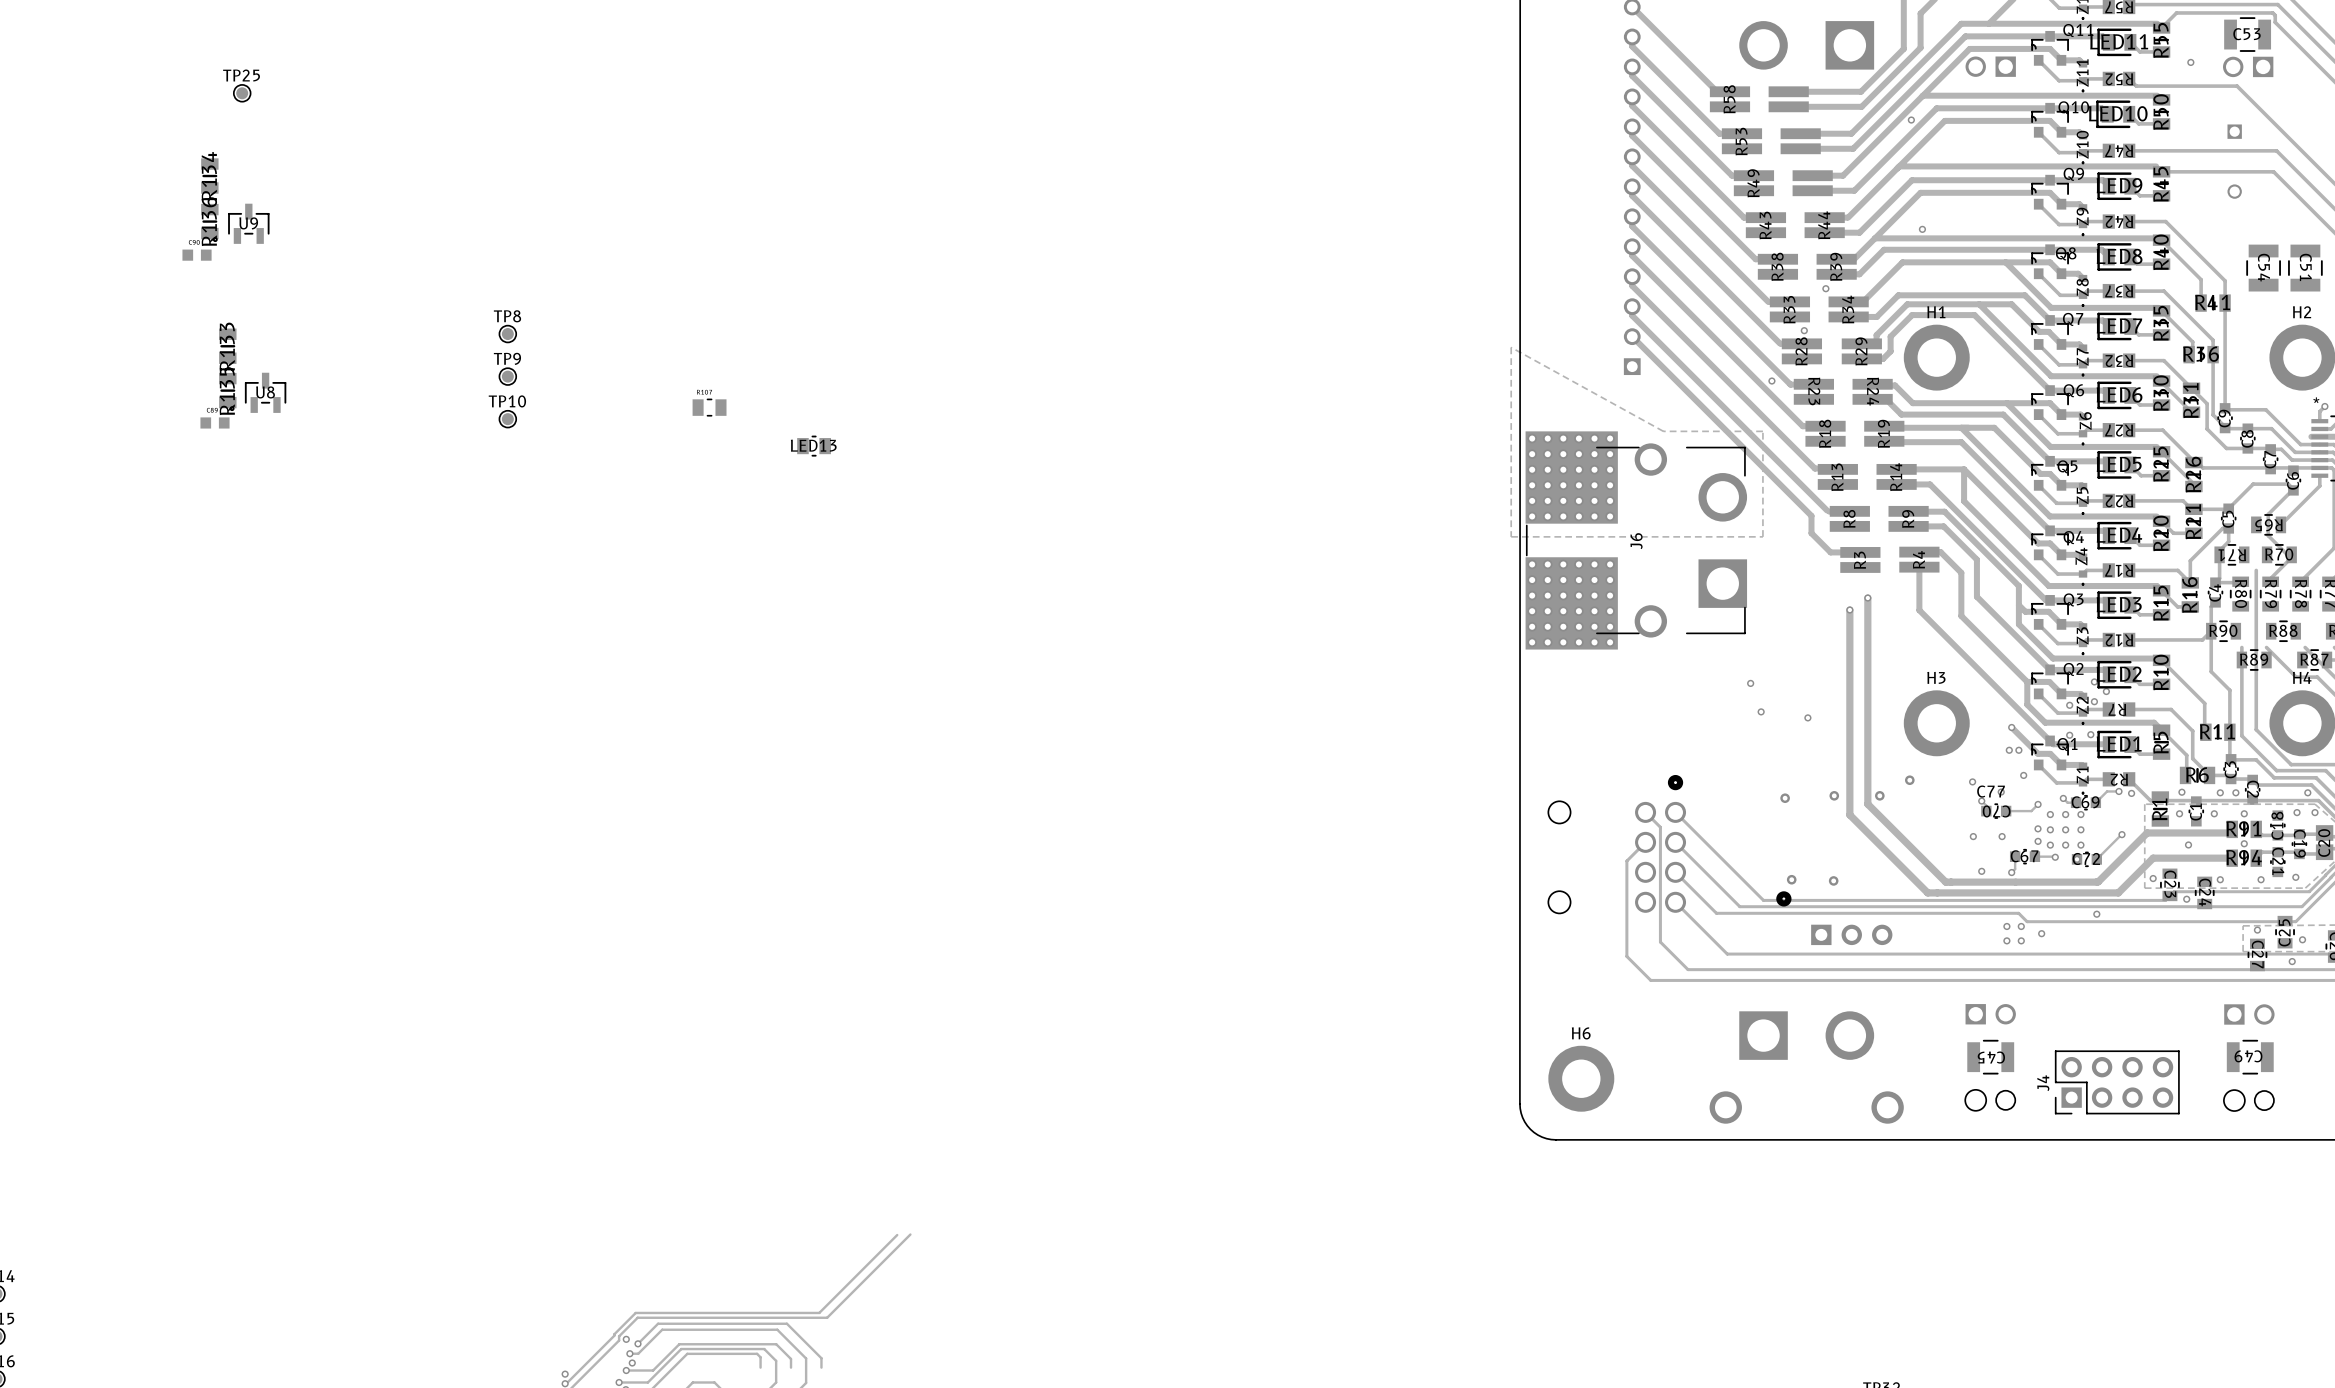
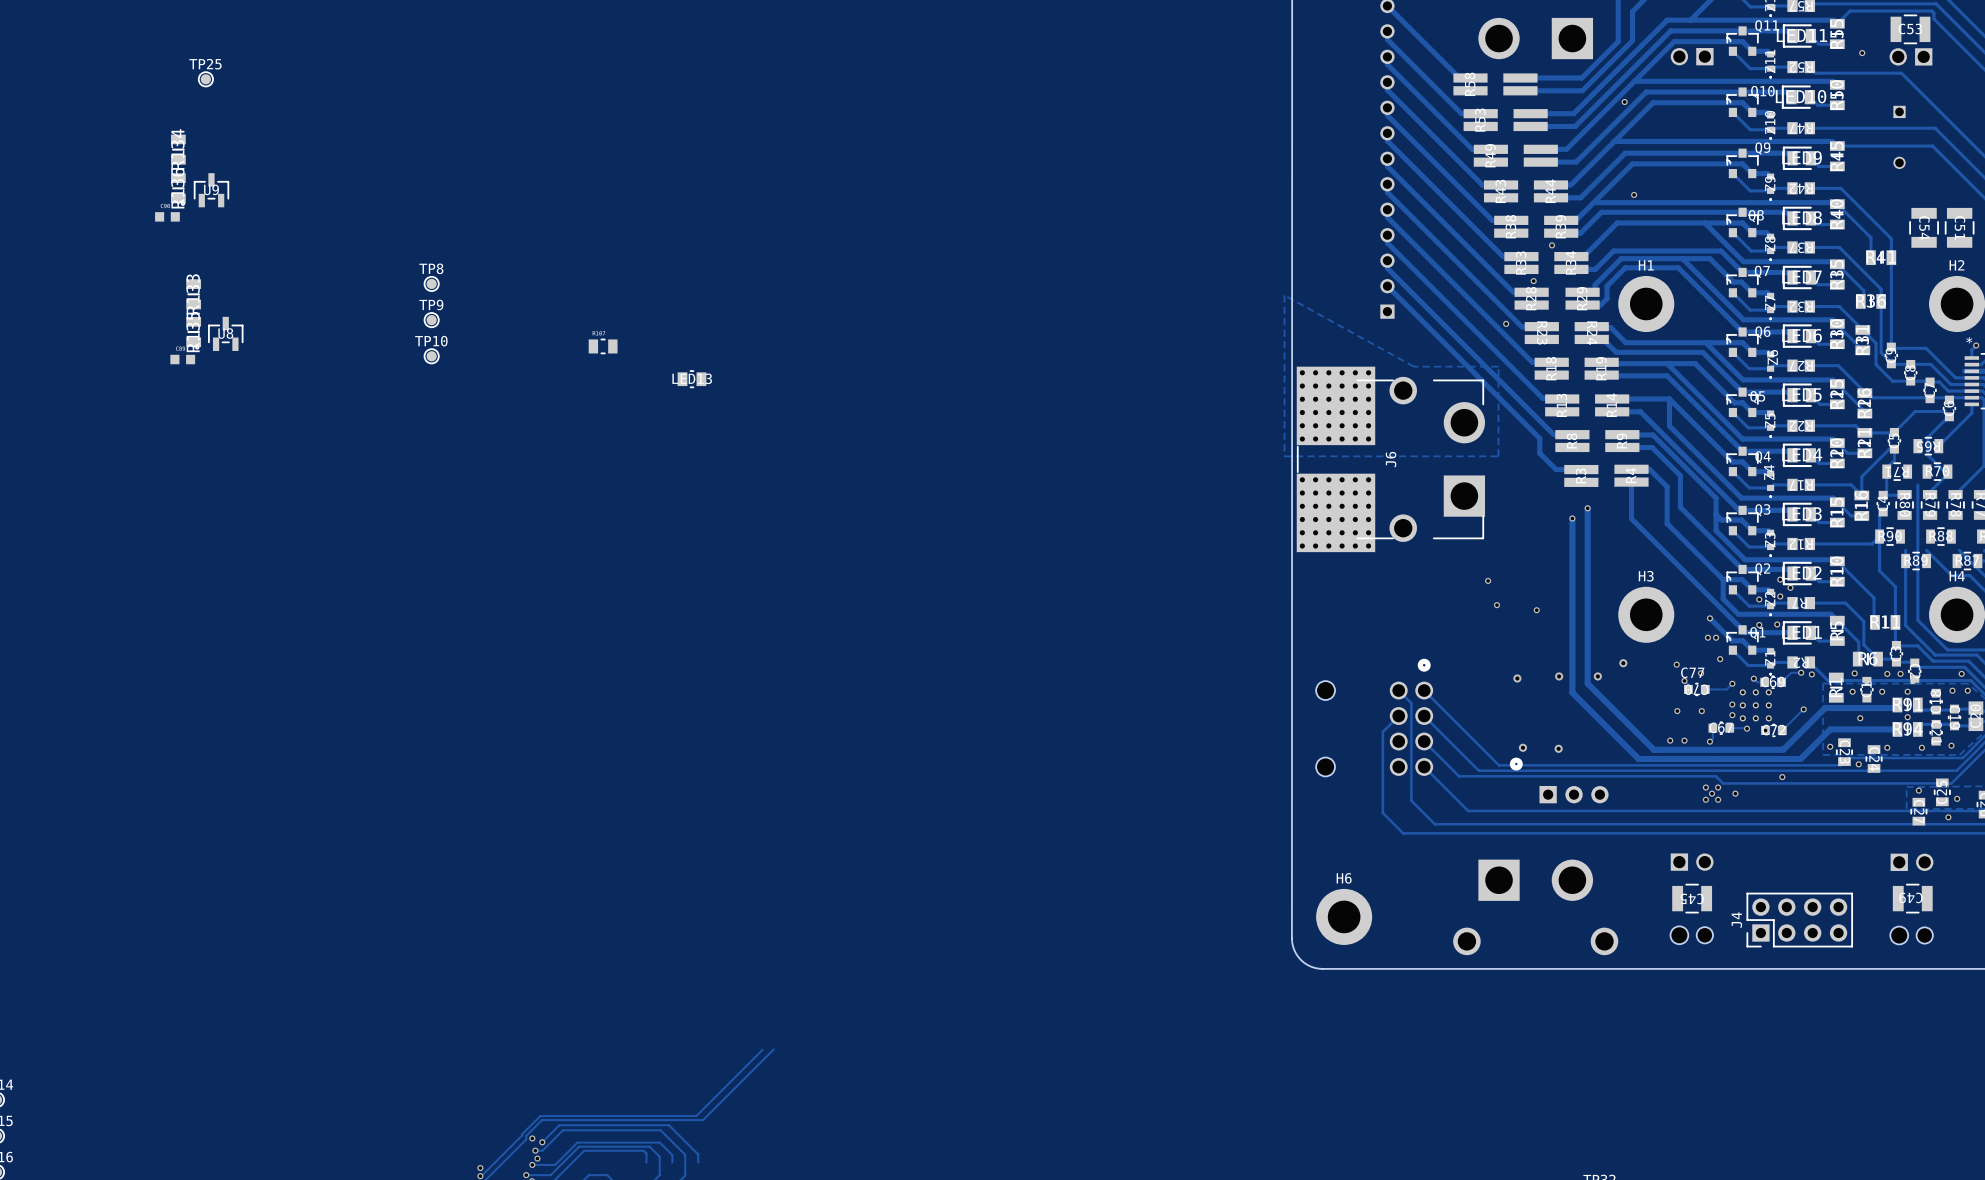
via: none -> (1670, 740)
via: none -> (1712, 793)

